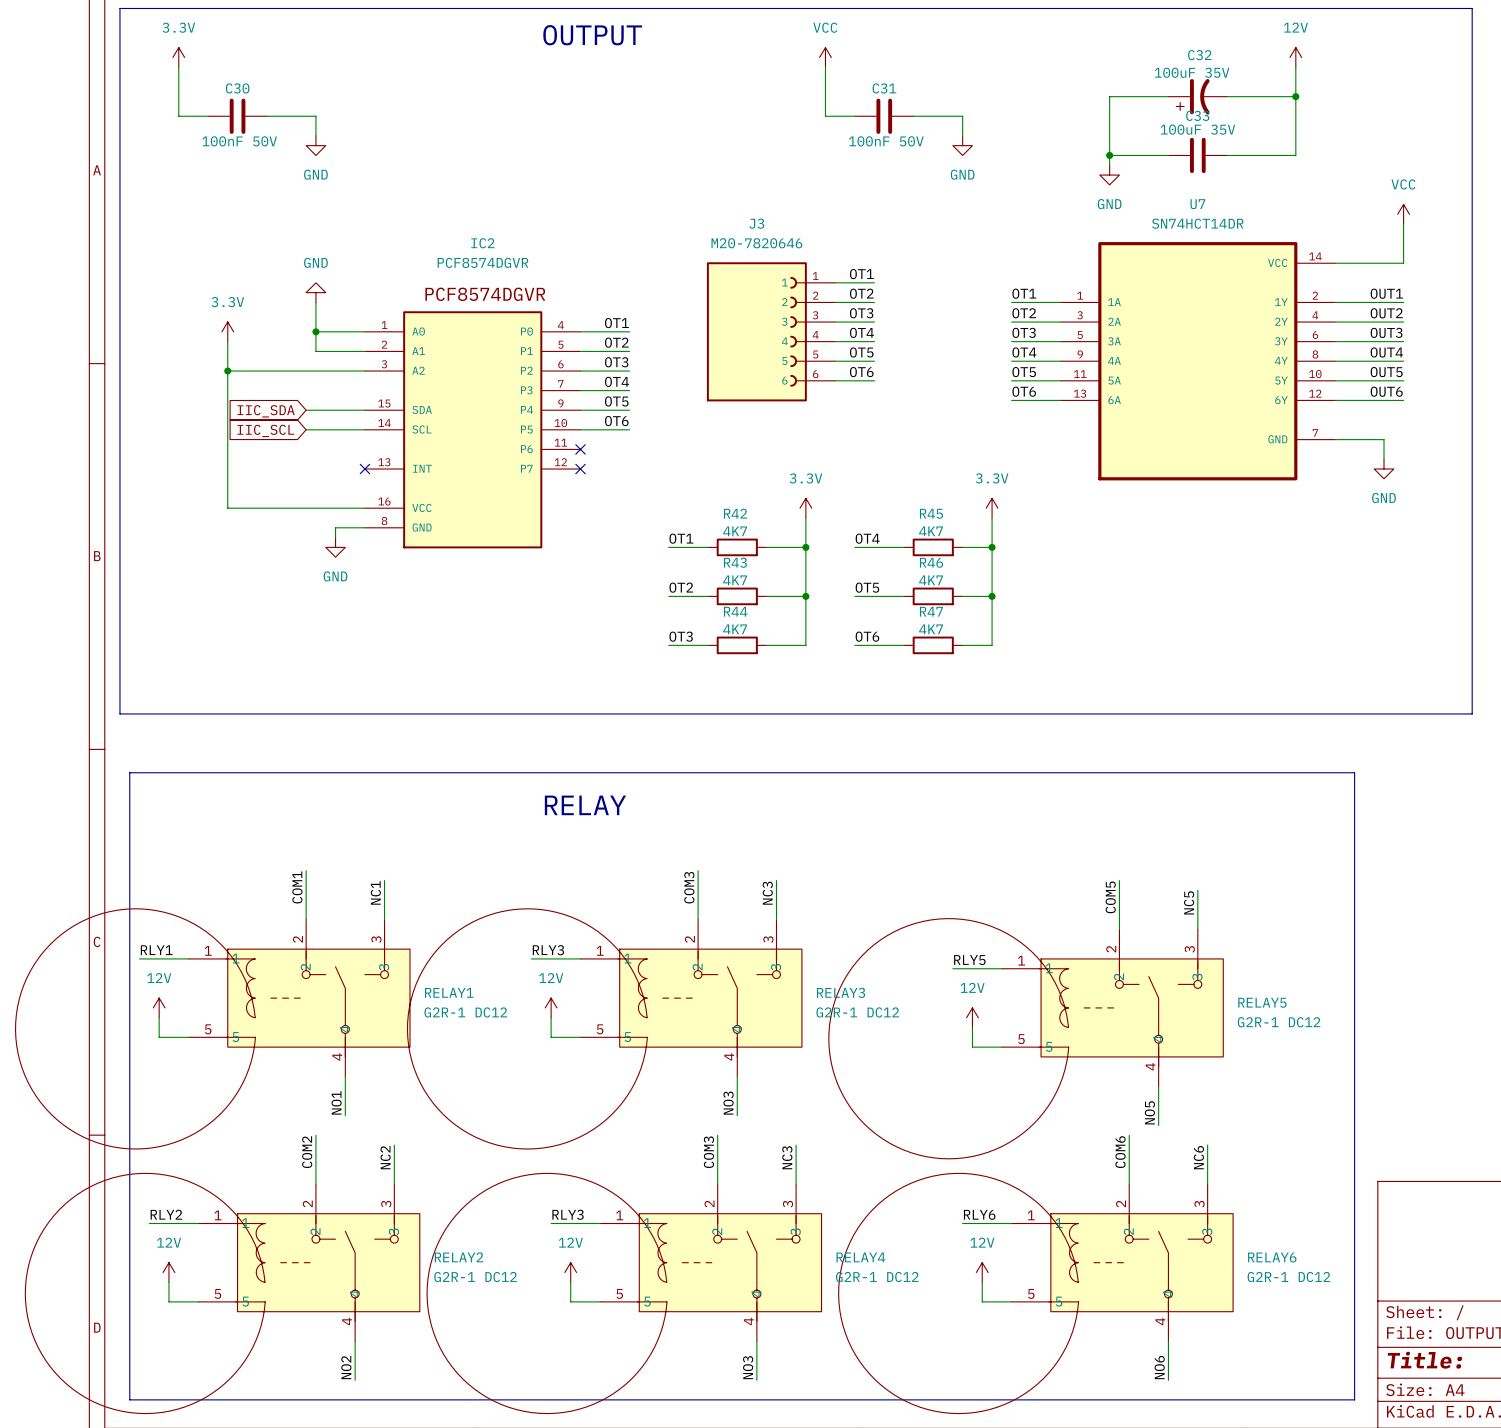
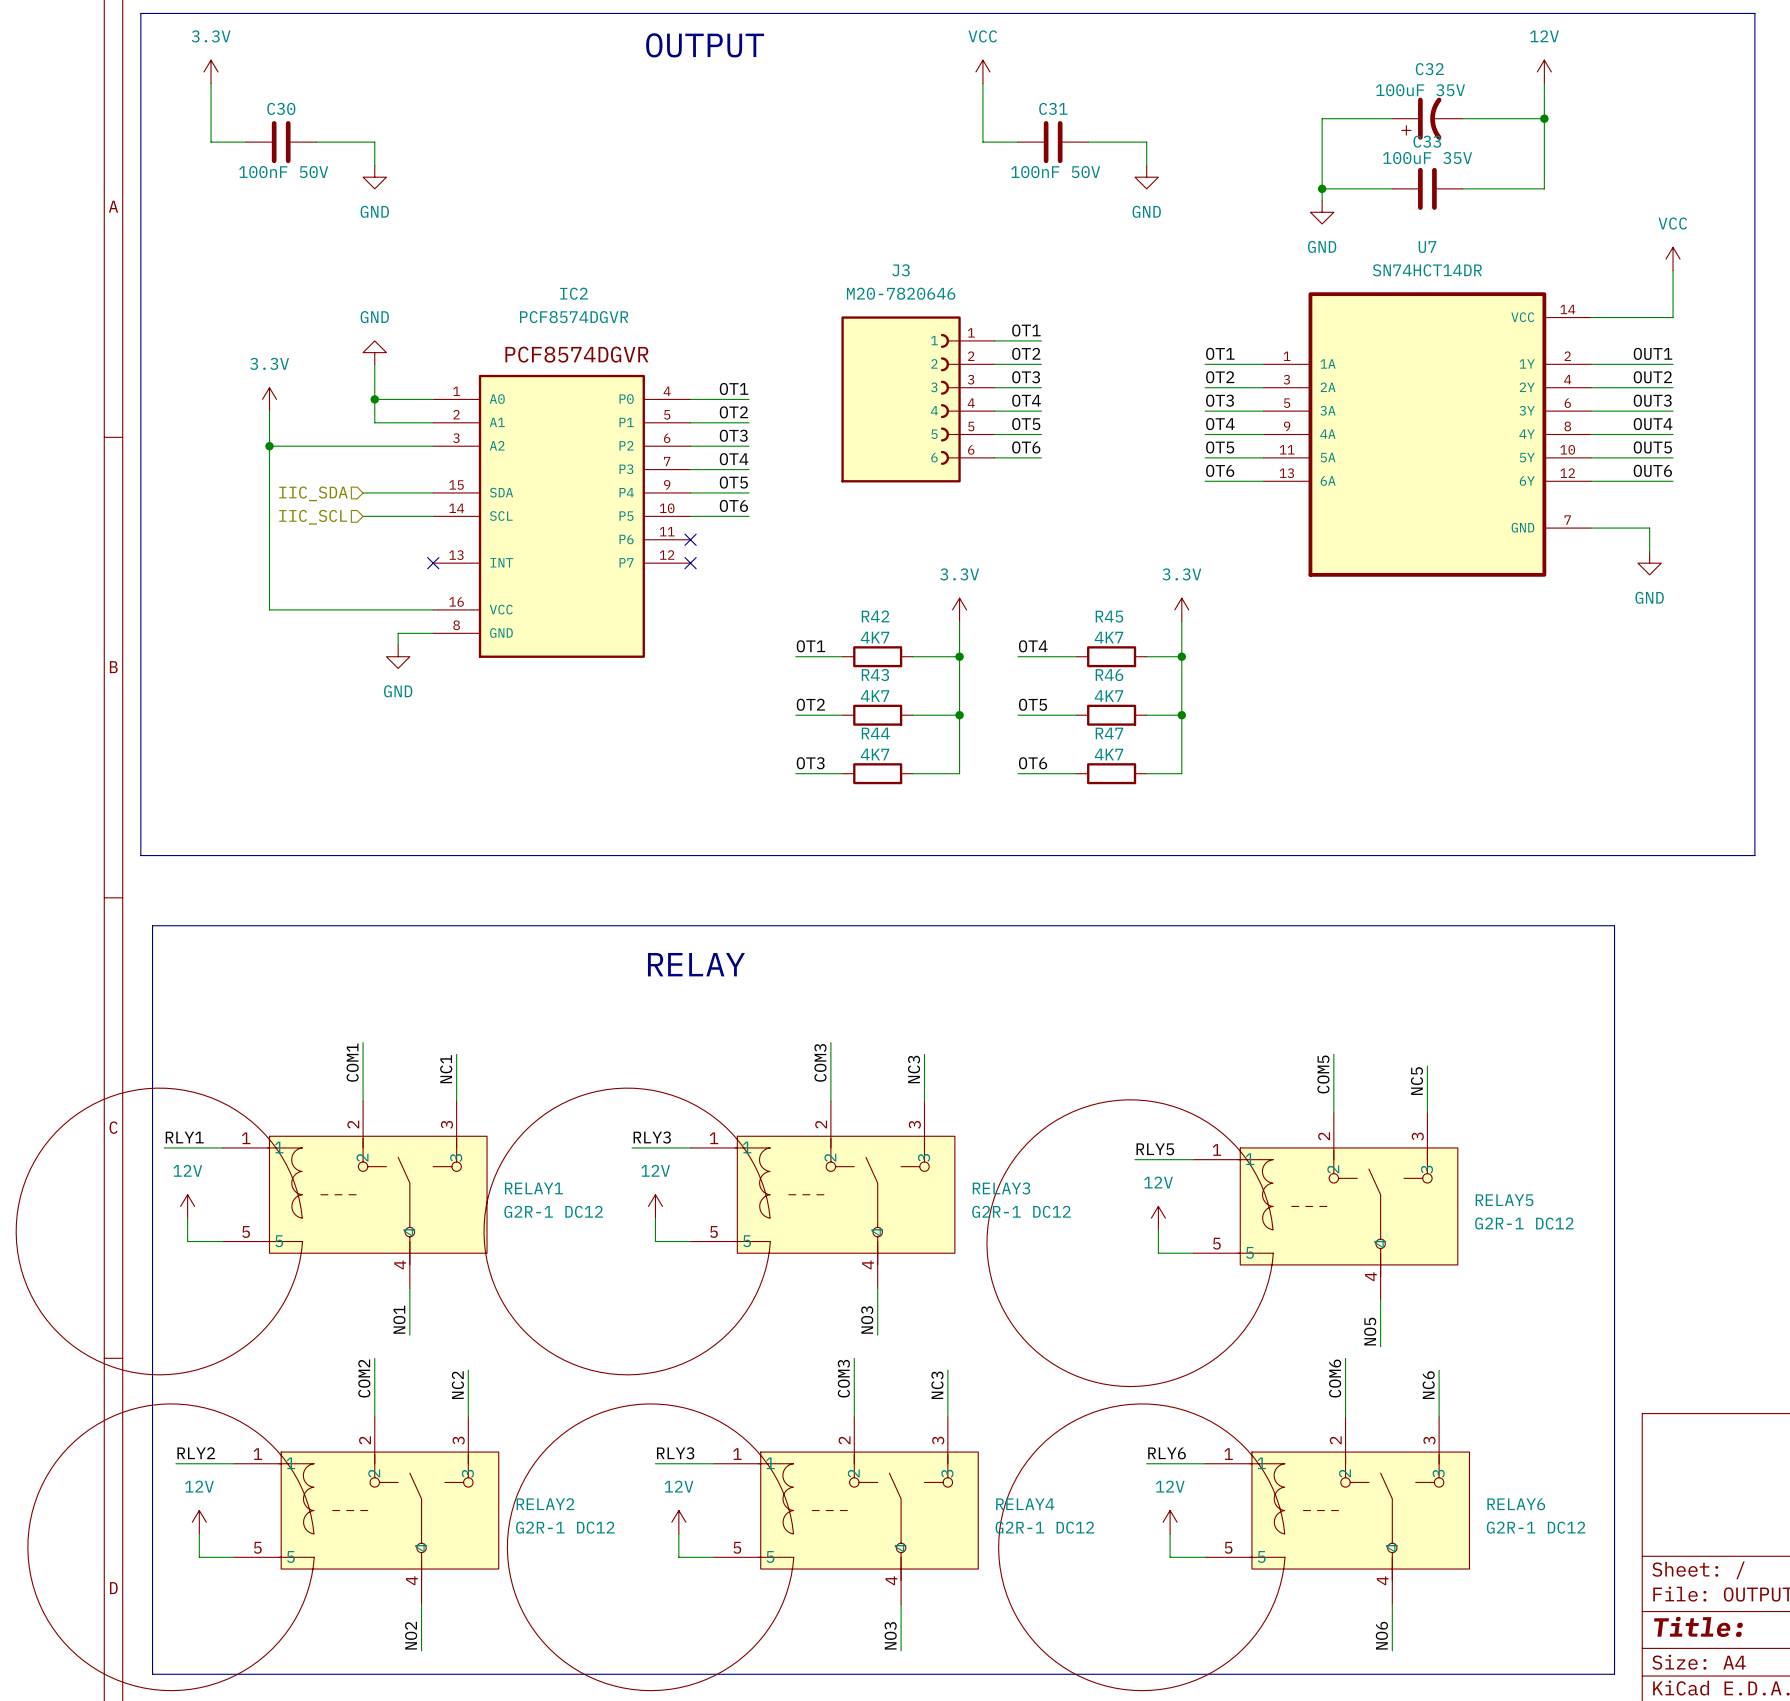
hierarchical label: none -> IIC_SDA (313, 493)
global label: IIC_SDA (266, 411) -> none
hierarchical label: none -> IIC_SCL (313, 517)
global label: IIC_SCL (265, 430) -> none

